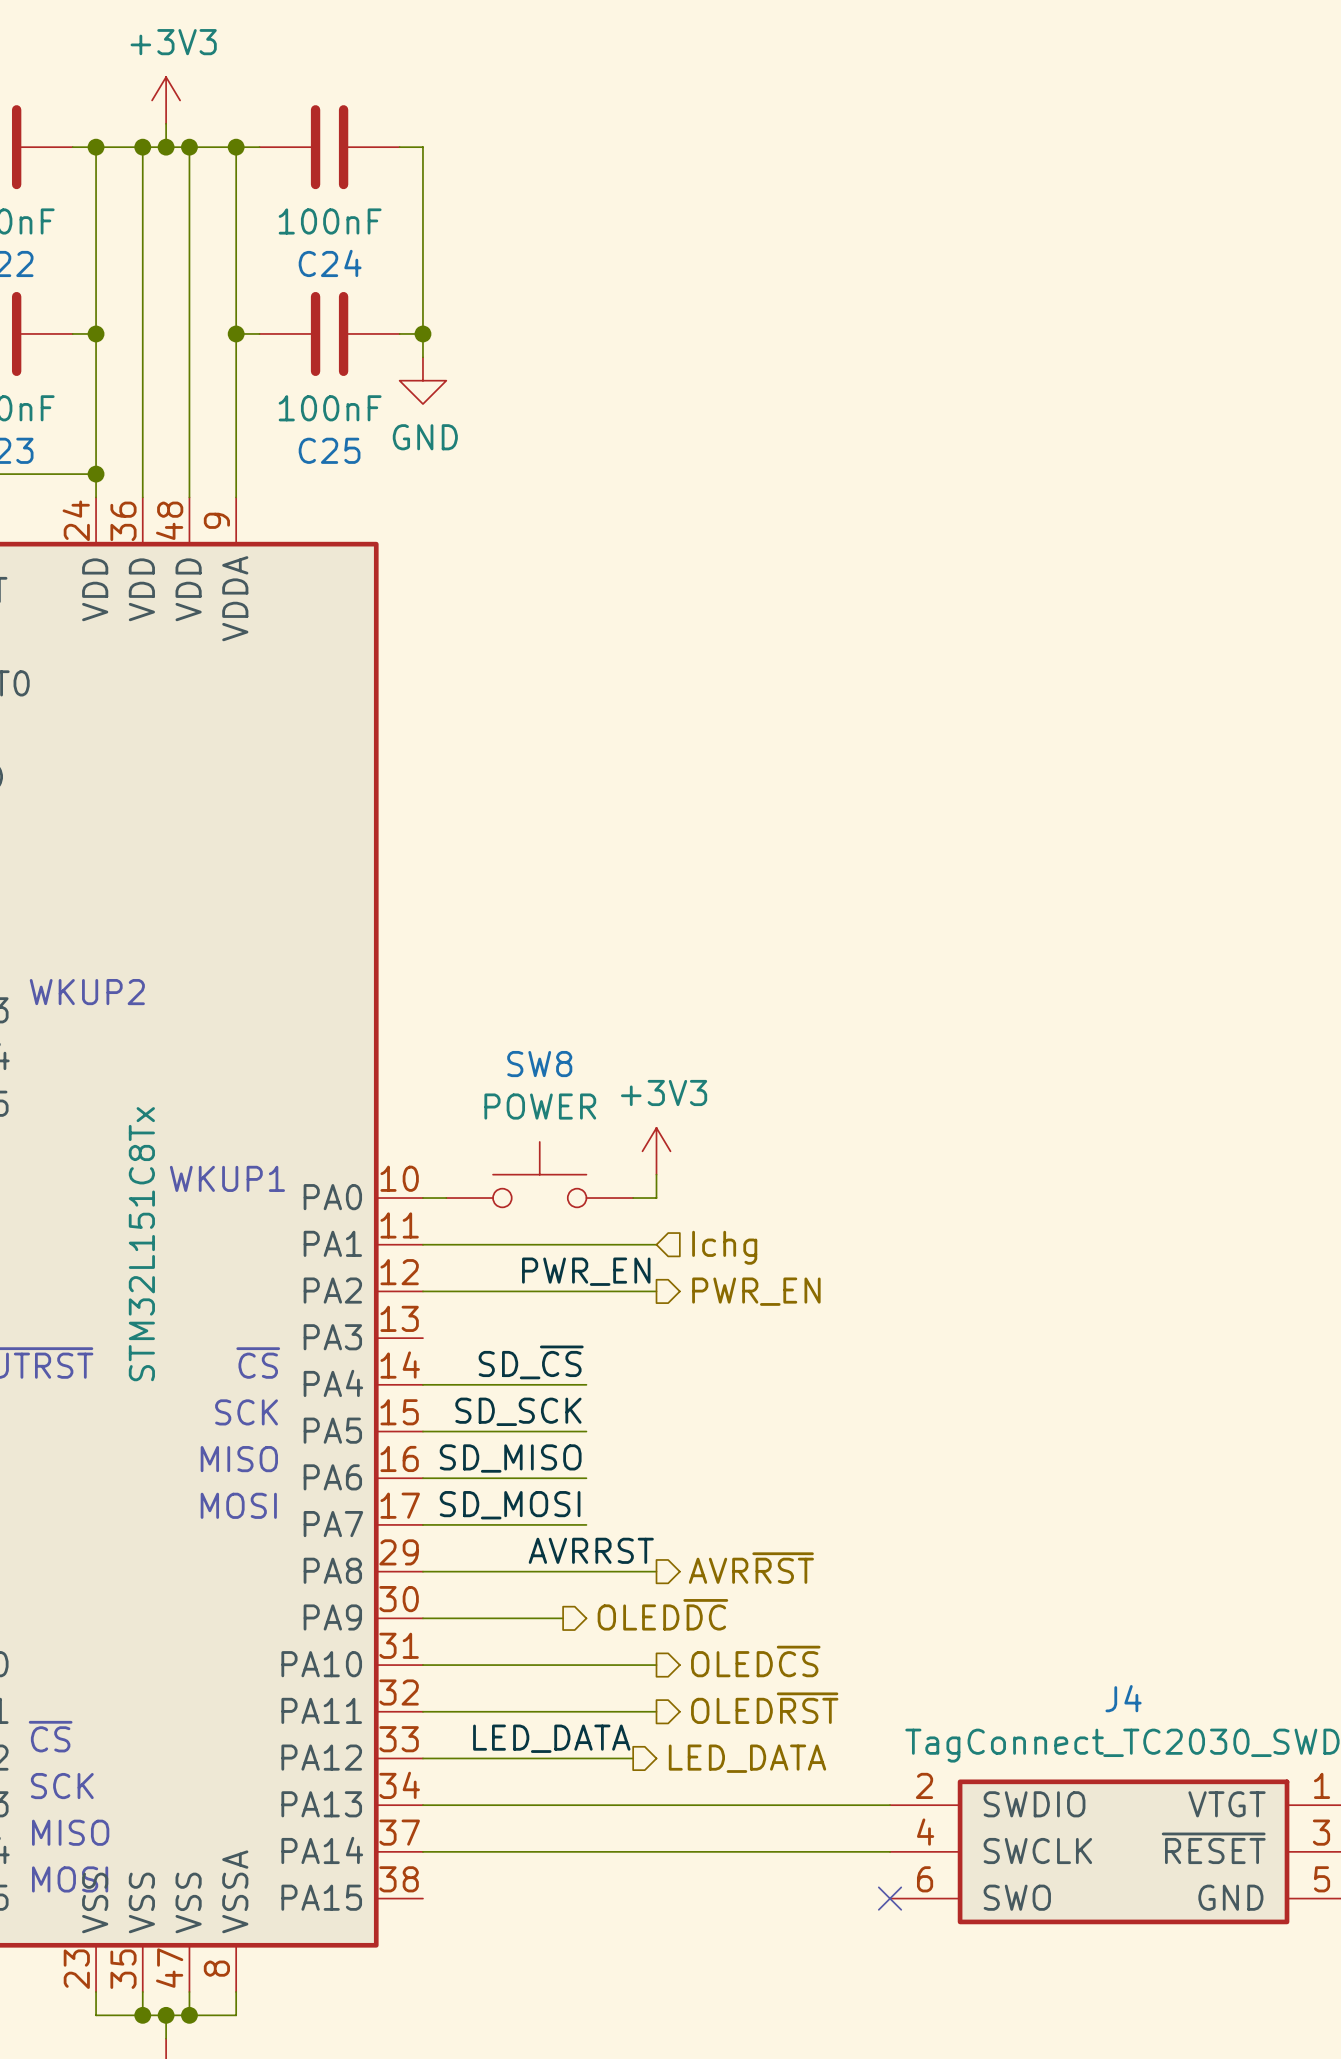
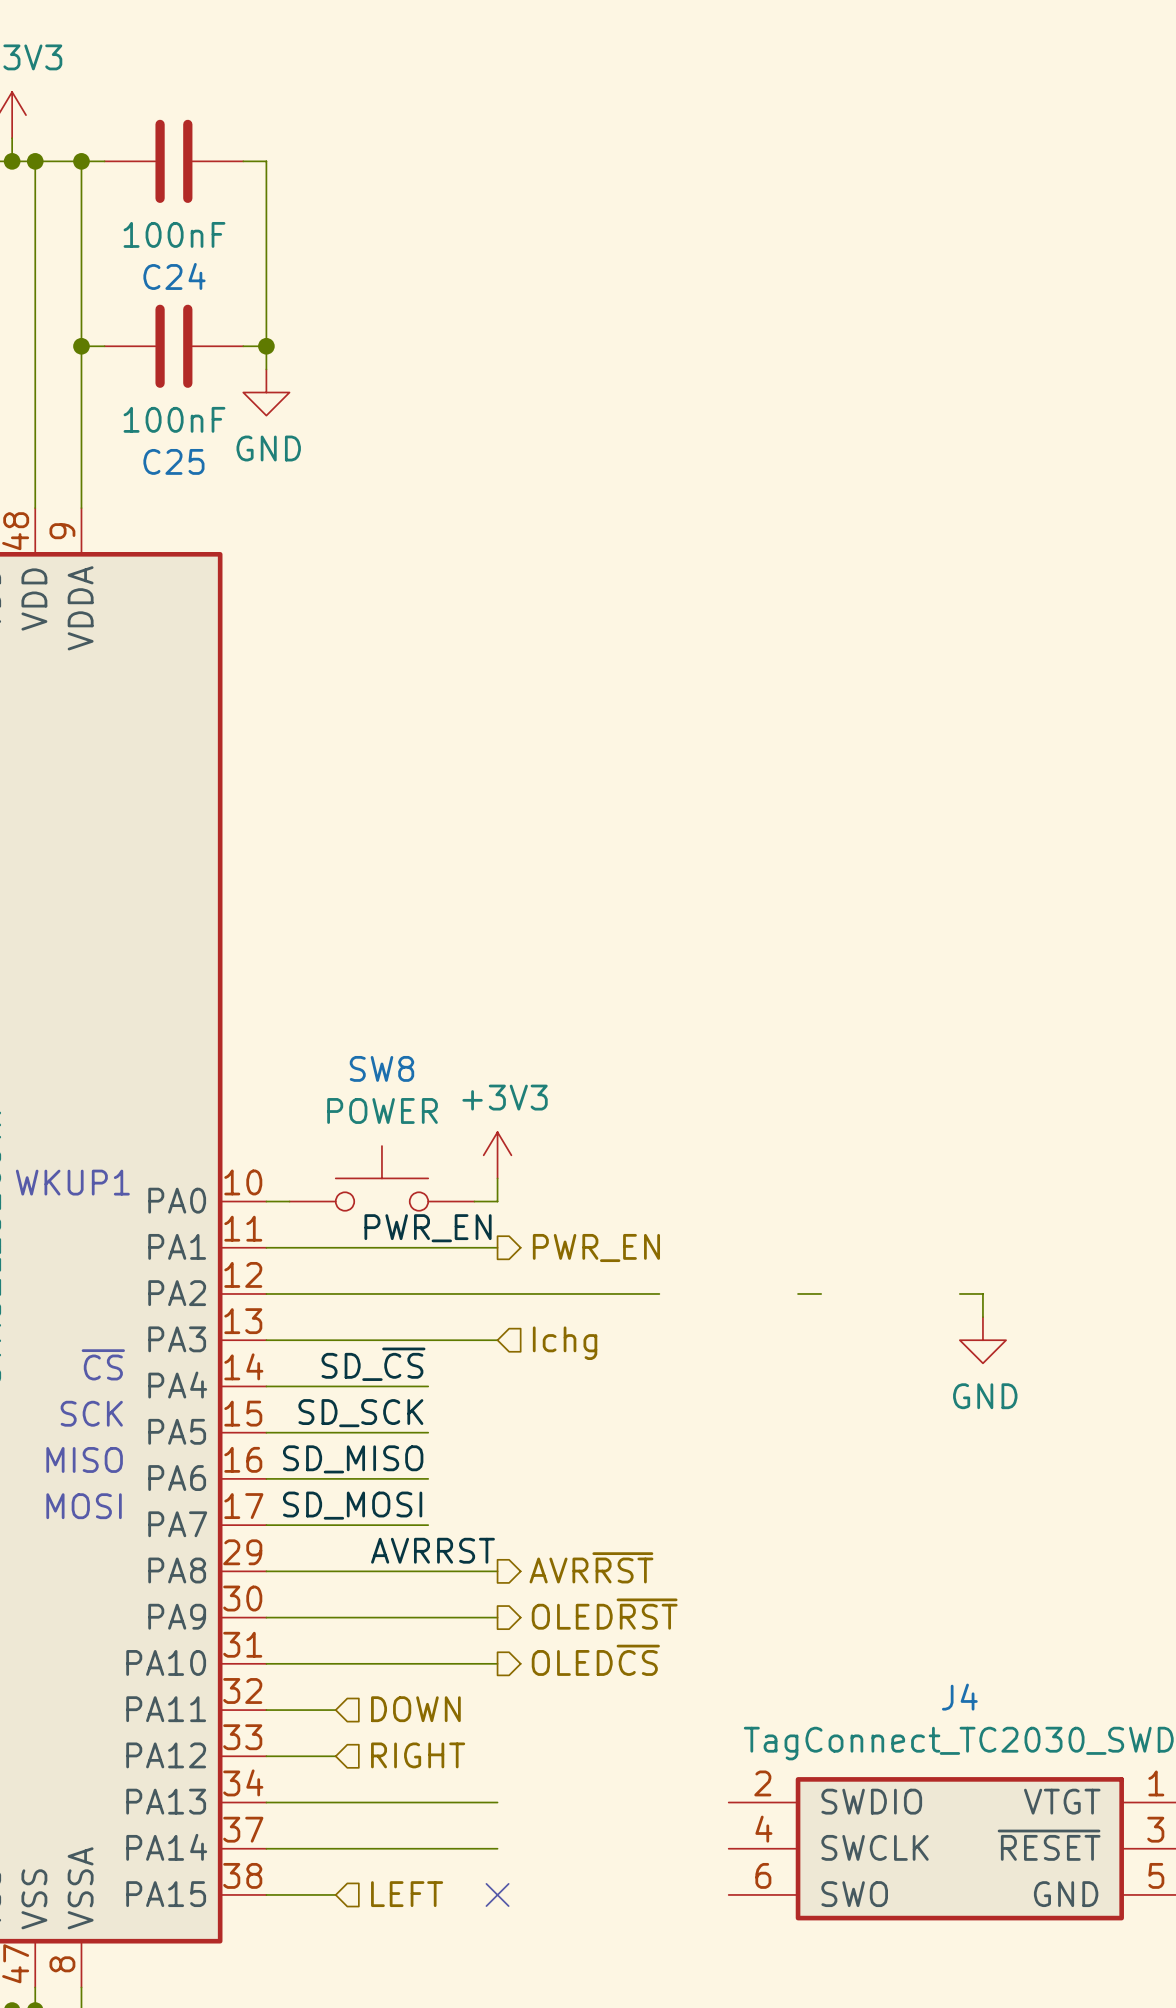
hierarchical label shape: input (724, 1247) -> output (596, 1247)
hierarchical label: Ichg (724, 1247) -> PWR_EN (596, 1247)
label position: PWR_EN (586, 1271) -> PWR_EN (428, 1228)
hierarchical label: PWR_EN (756, 1291) -> none
wire: none -> (798, 1293) (821, 1293)
wire: none -> (959, 1293) (982, 1293) (982, 1317)
wire: none -> (266, 1340) (497, 1340)
power symbol: none -> GND (982, 1340)
hierarchical label: none -> Ichg (565, 1343)
hierarchical label: OLED~{DC} (662, 1614) -> none
wire: none -> (405, 1617) (497, 1617)
hierarchical label position: OLED~{RST} (764, 1708) -> OLED~{RST} (604, 1614)
hierarchical label: none -> DOWN (415, 1709)
wire: (493, 1711) (656, 1711) -> (497, 1293) (659, 1293)
label: LED_DATA (551, 1738) -> none
hierarchical label: none -> RIGHT (418, 1755)
wire: (493, 1758) (633, 1758) -> none
hierarchical label: LED_DATA (747, 1758) -> none
wire: (656, 1805) (890, 1805) -> none
wire: (656, 1851) (890, 1851) -> none
hierarchical label: none -> LEFT (407, 1894)
wire: none -> (266, 1894) (335, 1894)
no-connect mark: none -> (497, 1894)
no-connect mark: (890, 1898) -> none

